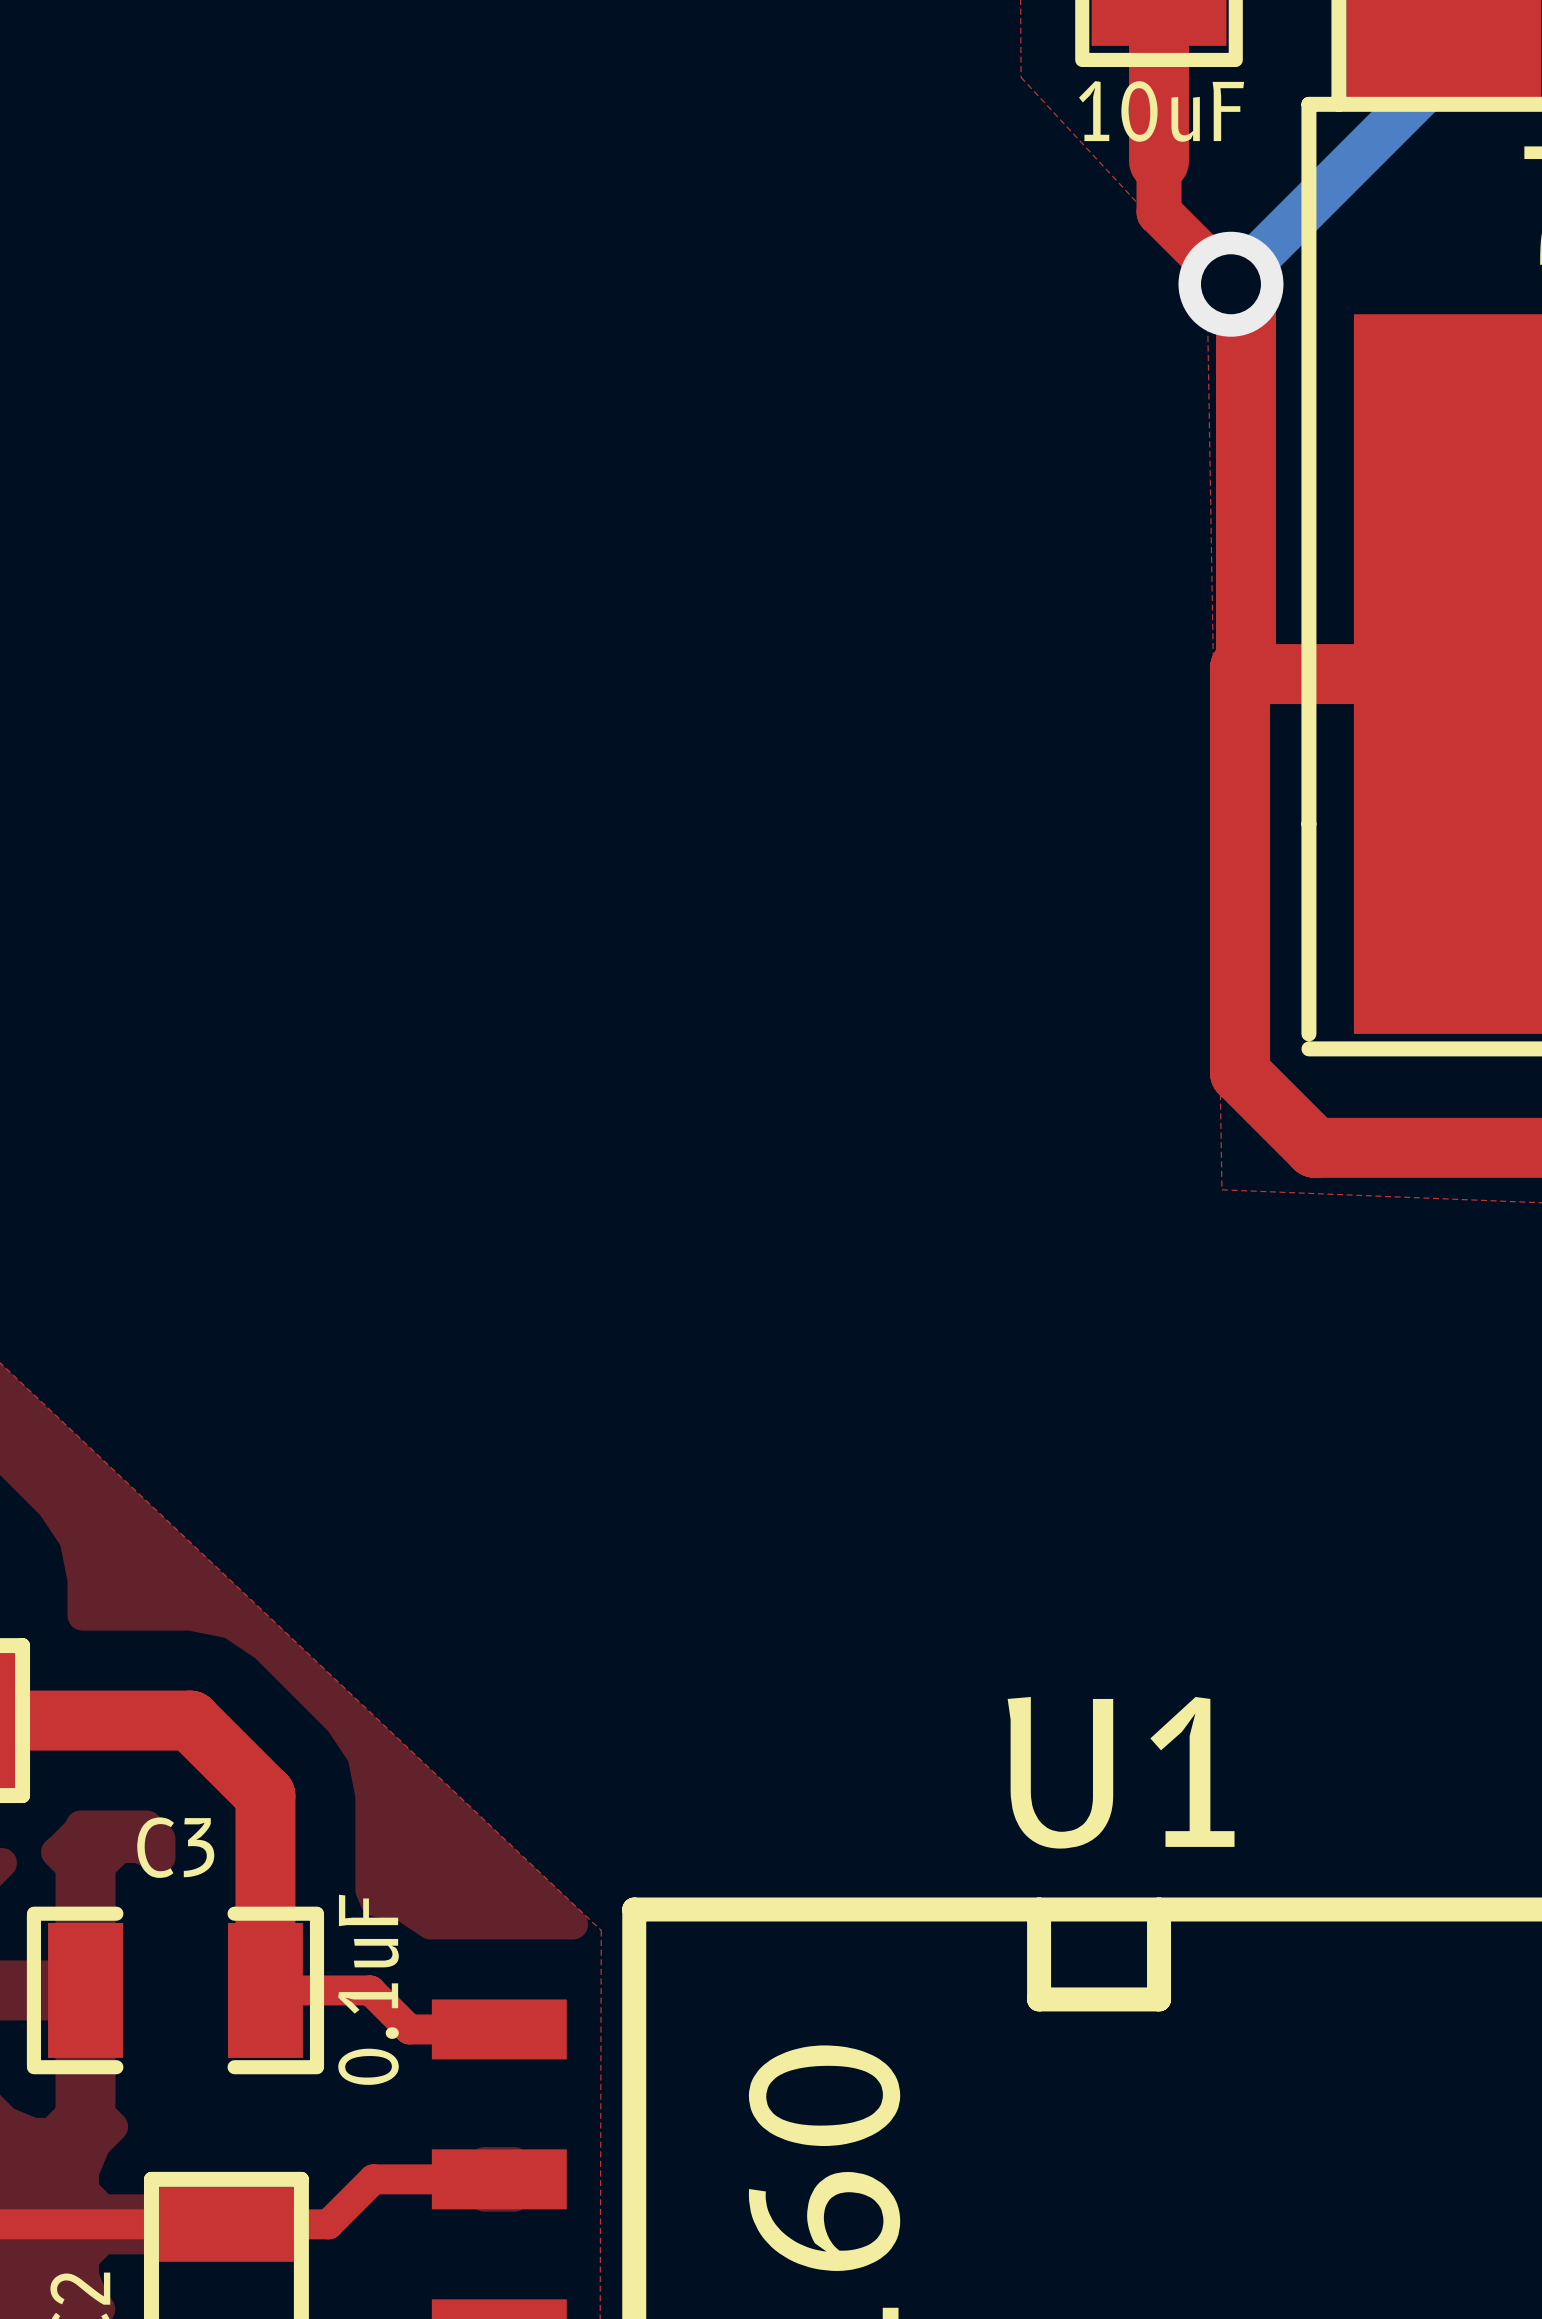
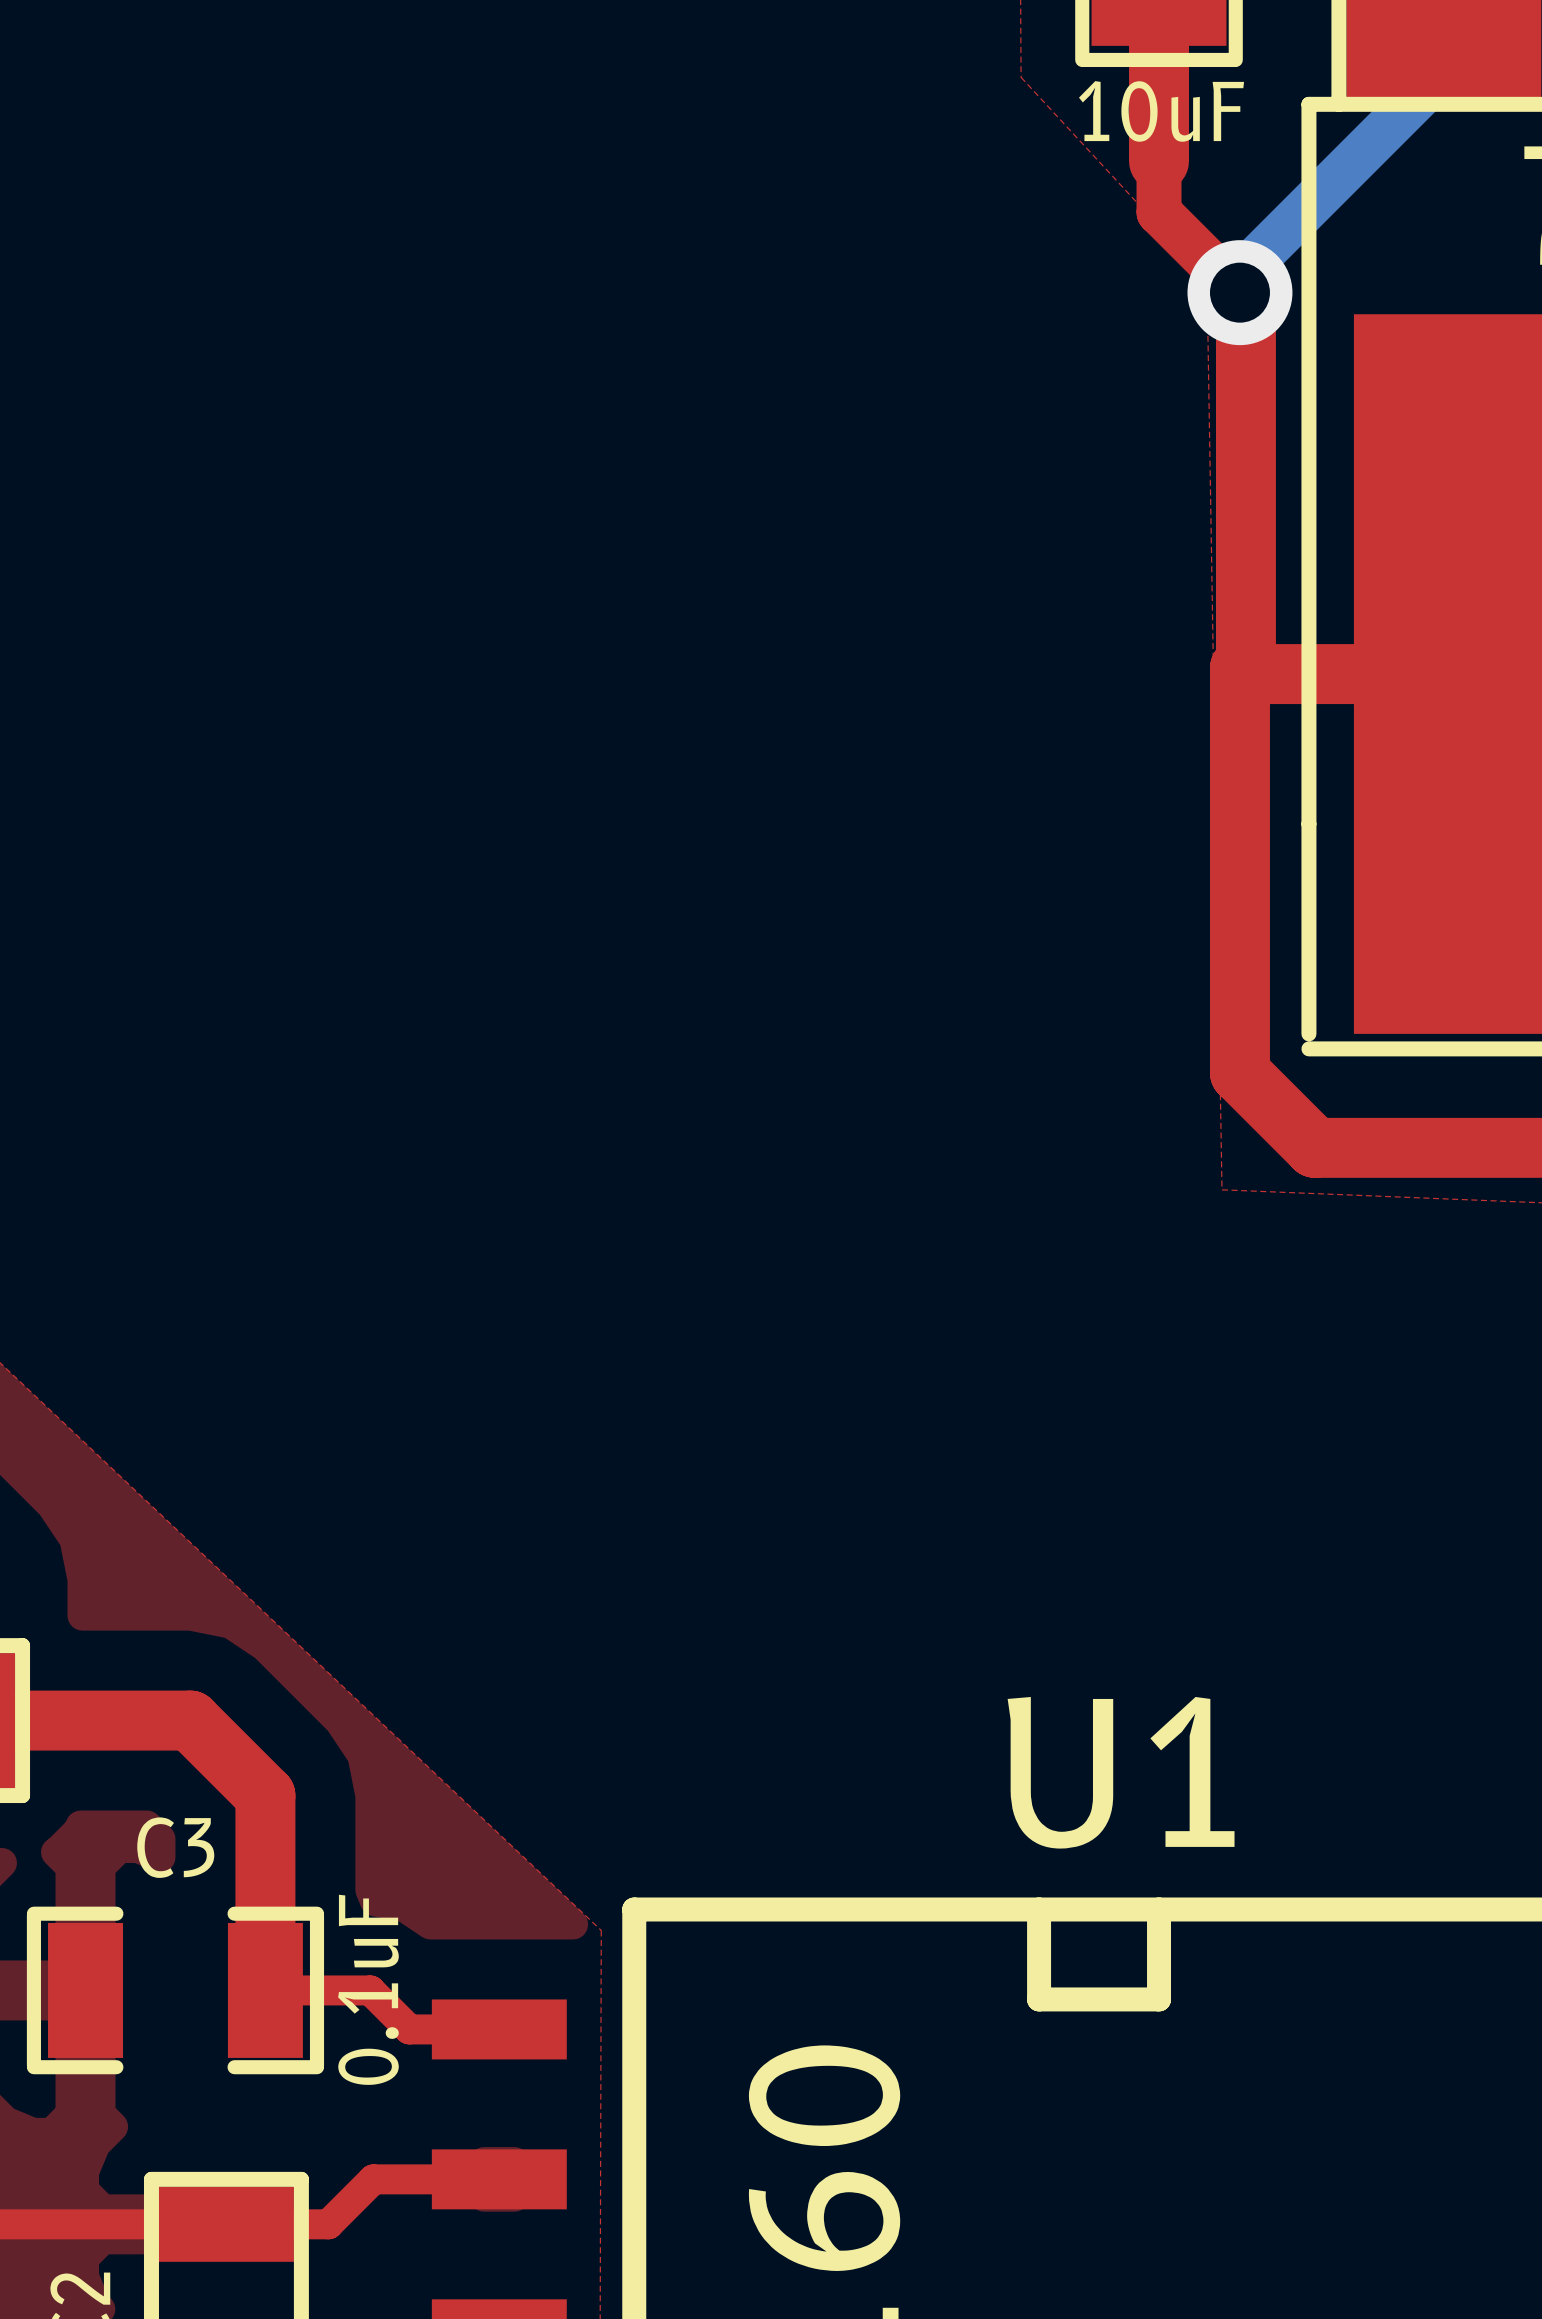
via position: (1230, 284) -> (1239, 292)

